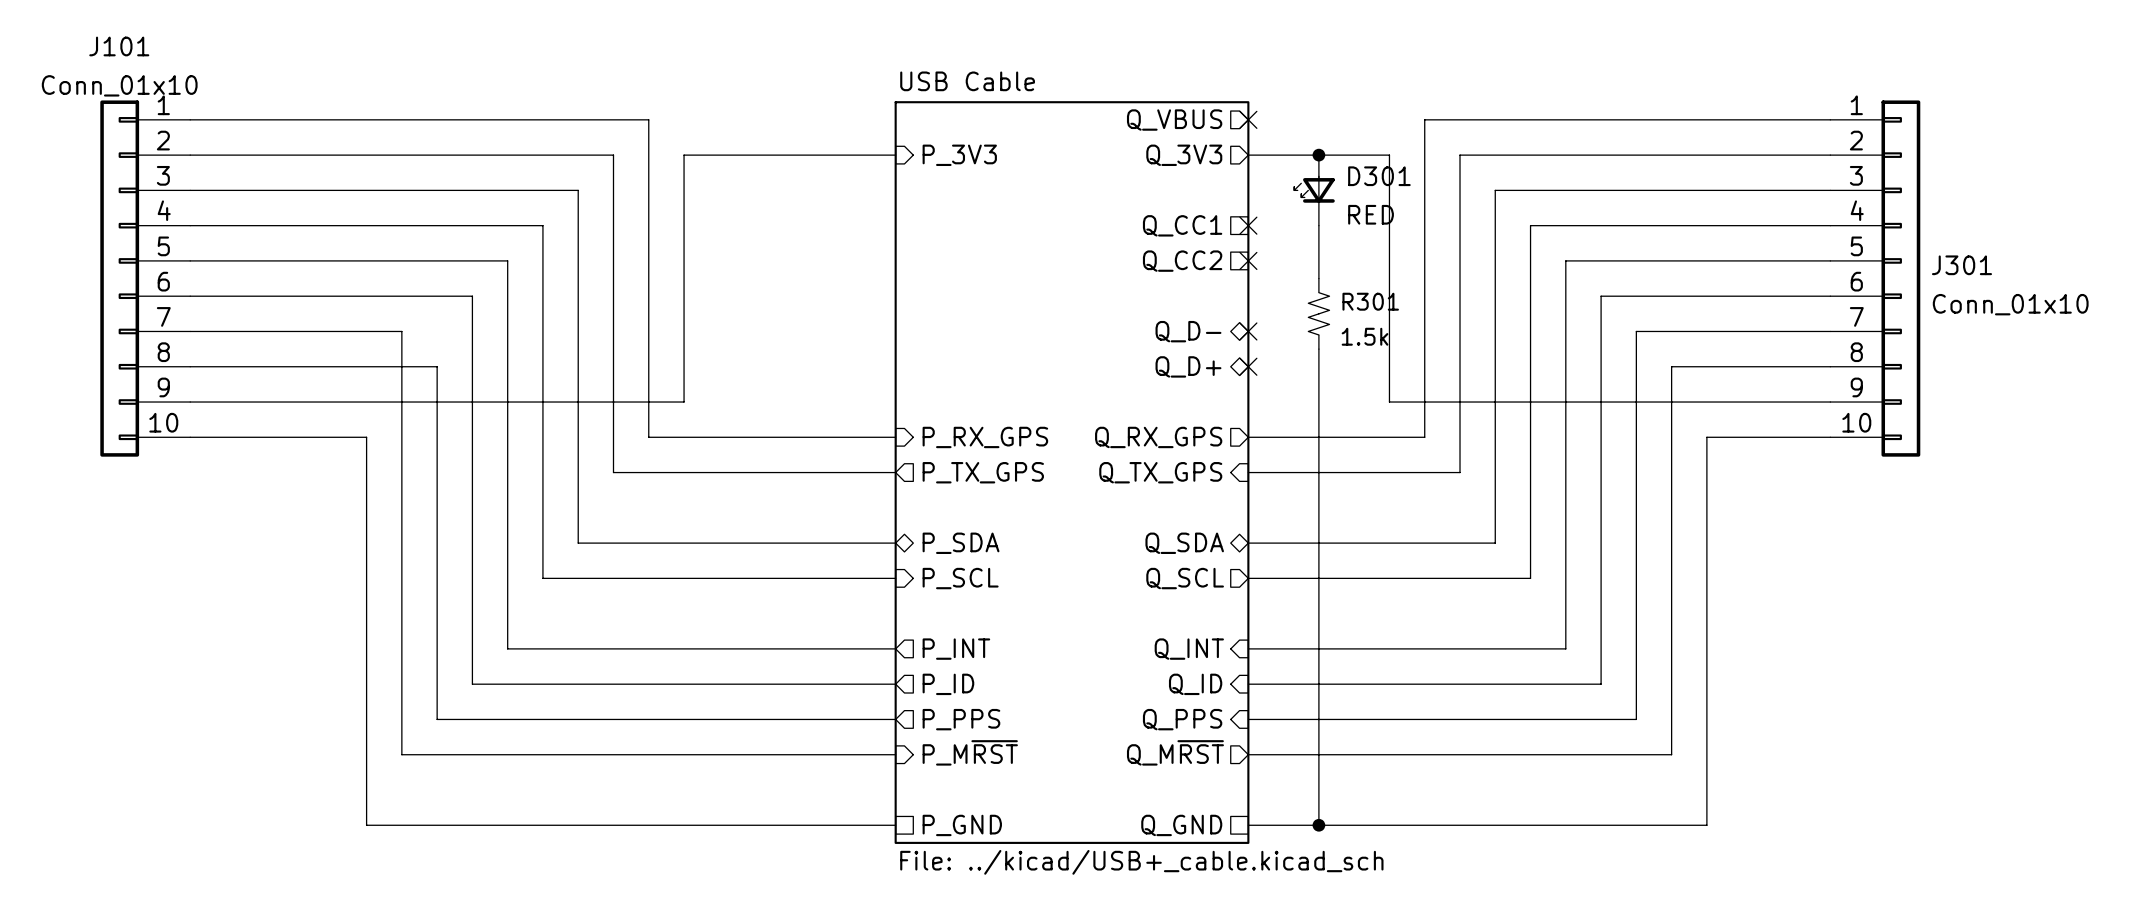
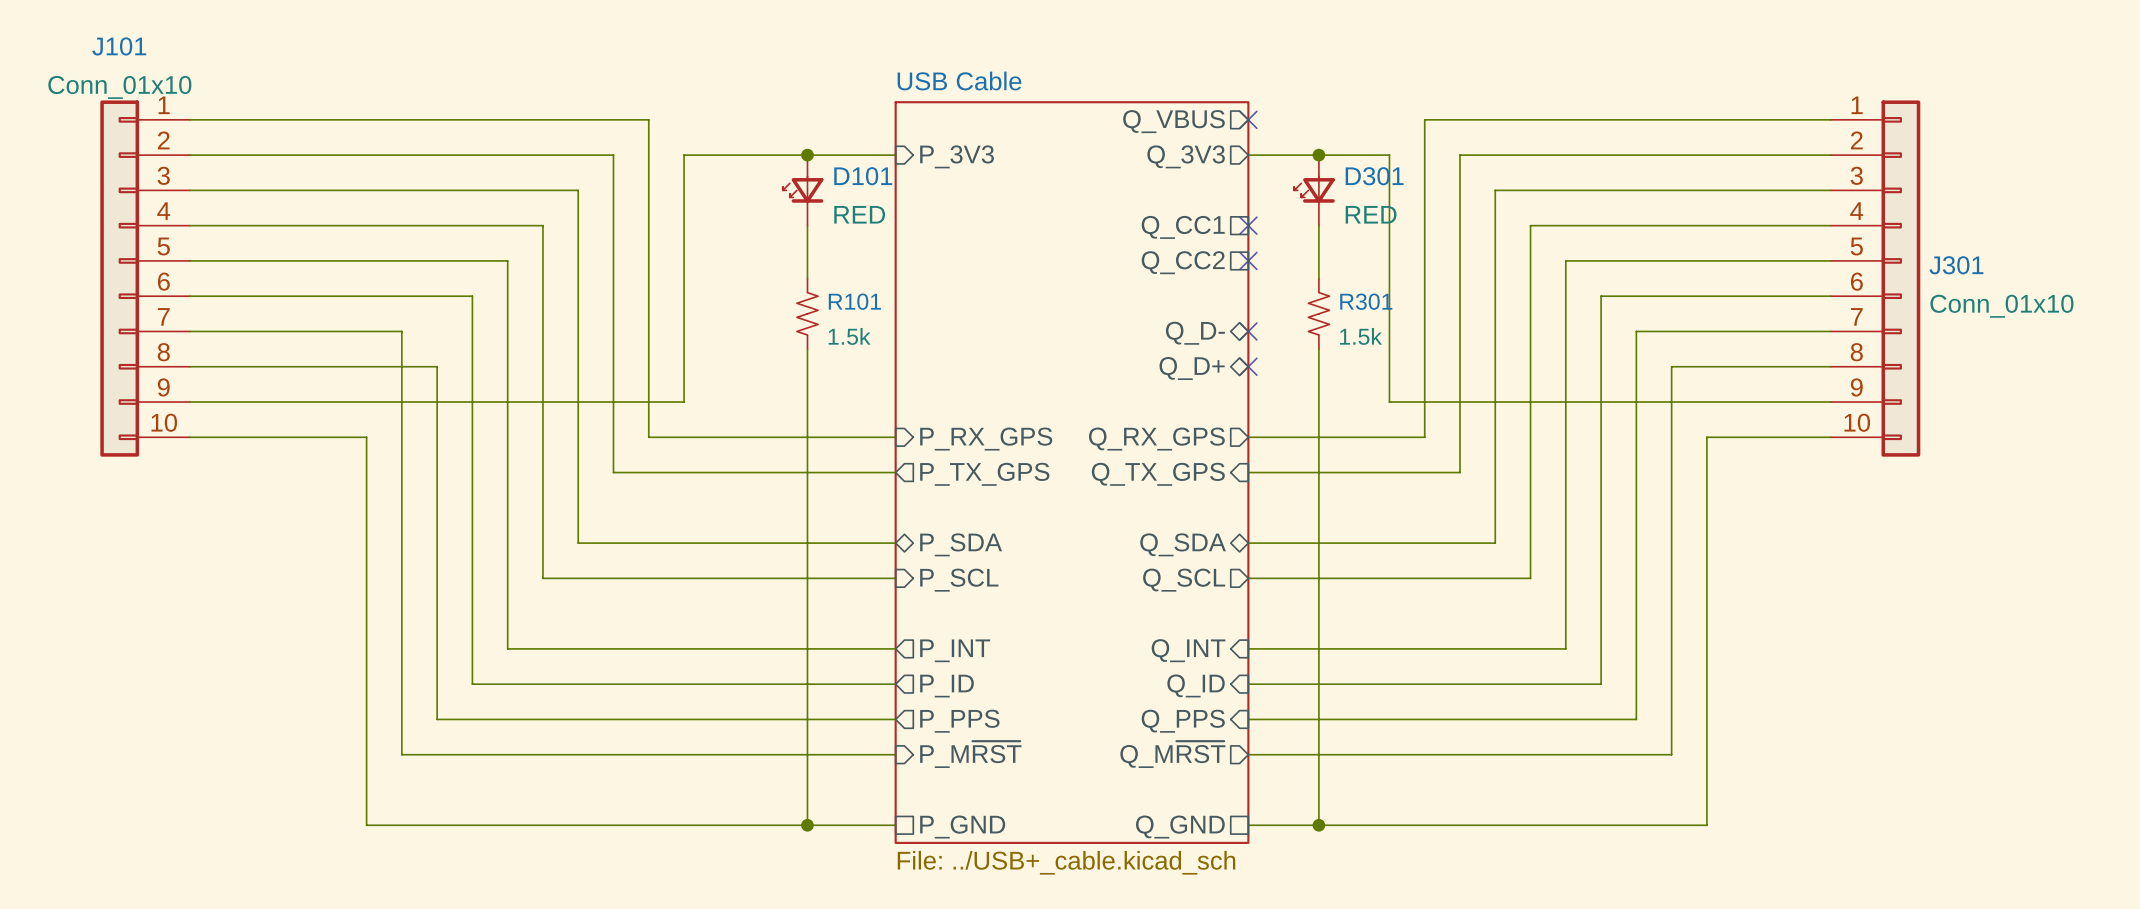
junction: none -> (807, 155)
D101: none -> RED (803, 190)
wire: none -> (807, 225) (807, 278)
R101: none -> 1.5k (807, 313)
wire: none -> (807, 349) (807, 825)
junction: none -> (807, 825)
sheet USB Cable value: File: ../kicad/USB+_cable.kicad_sch (1141, 862) -> File: ../USB+_cable.kicad_sch (1066, 862)

